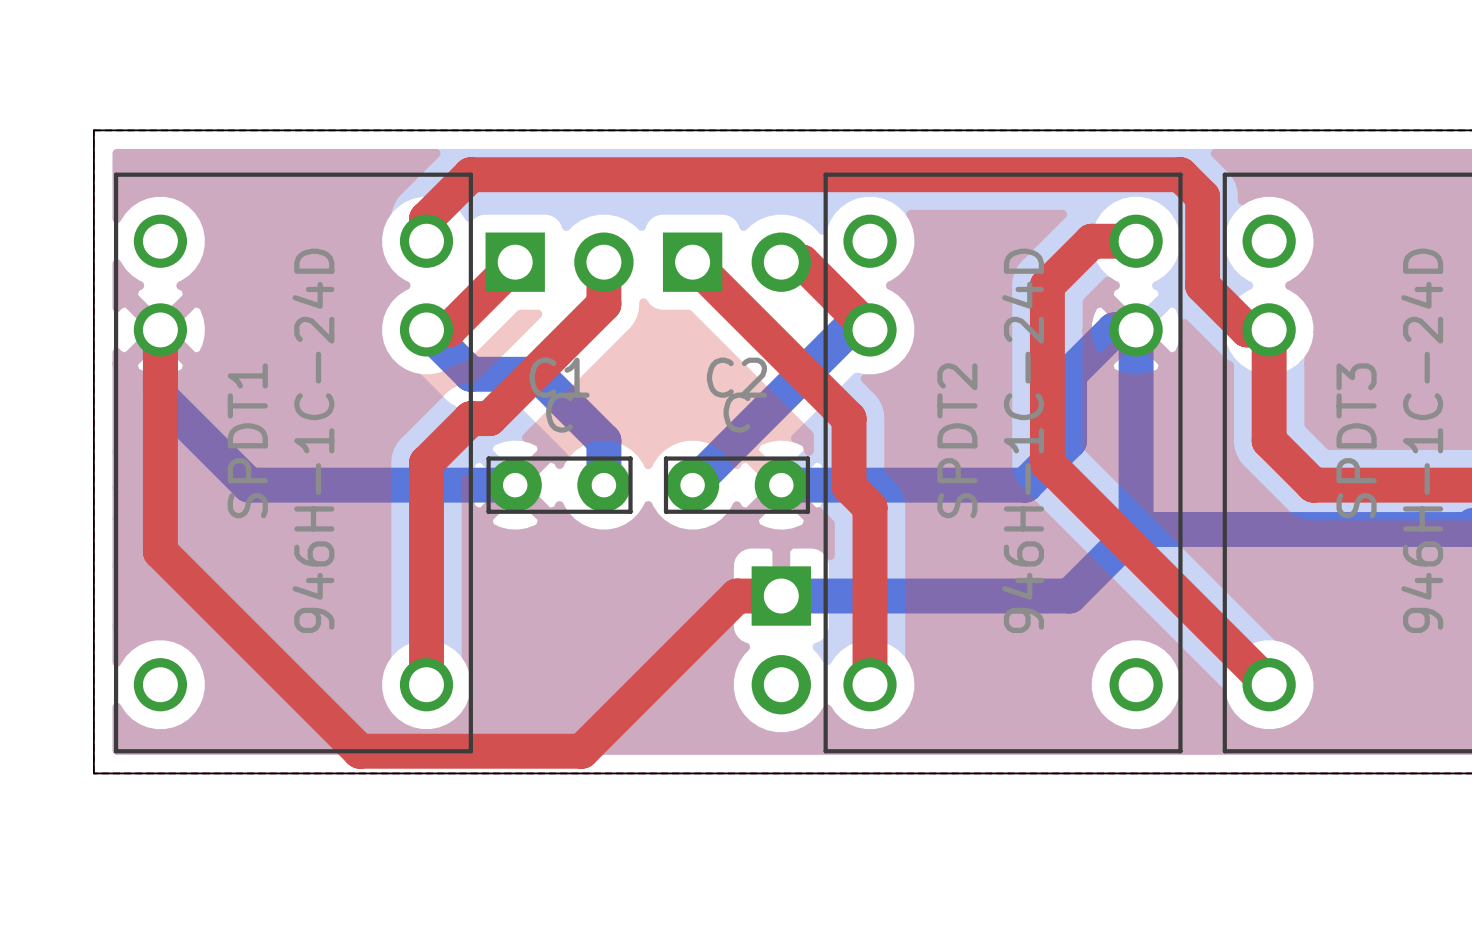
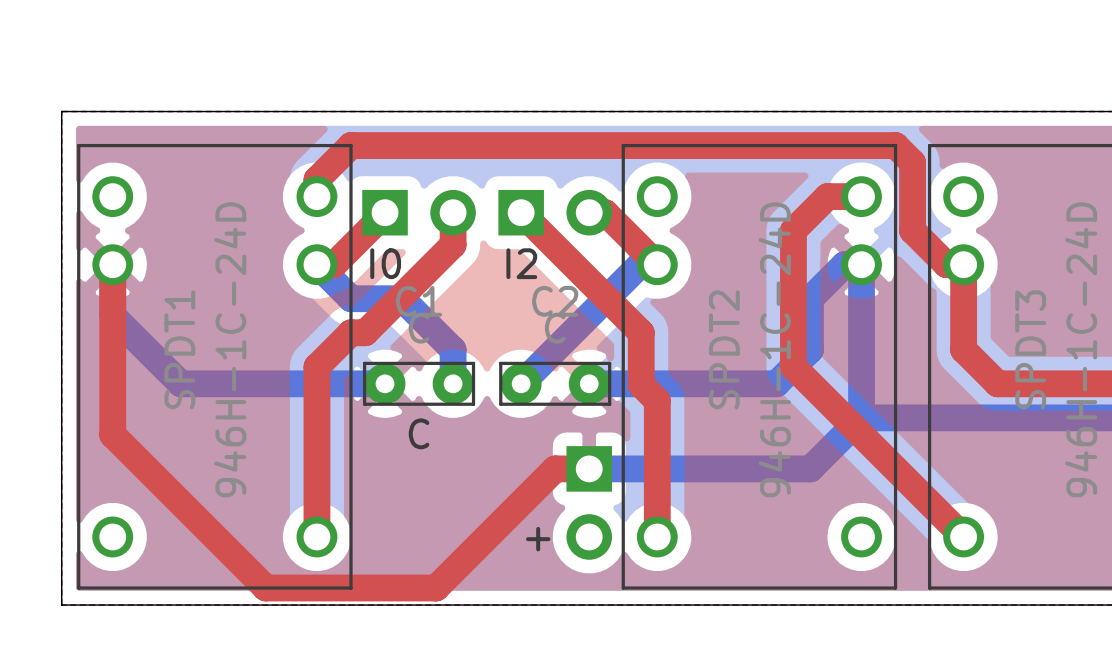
text: none -> I0 (385, 263)
text: none -> I2 (521, 263)
text: none -> C (419, 433)
text: none -> + (538, 539)

